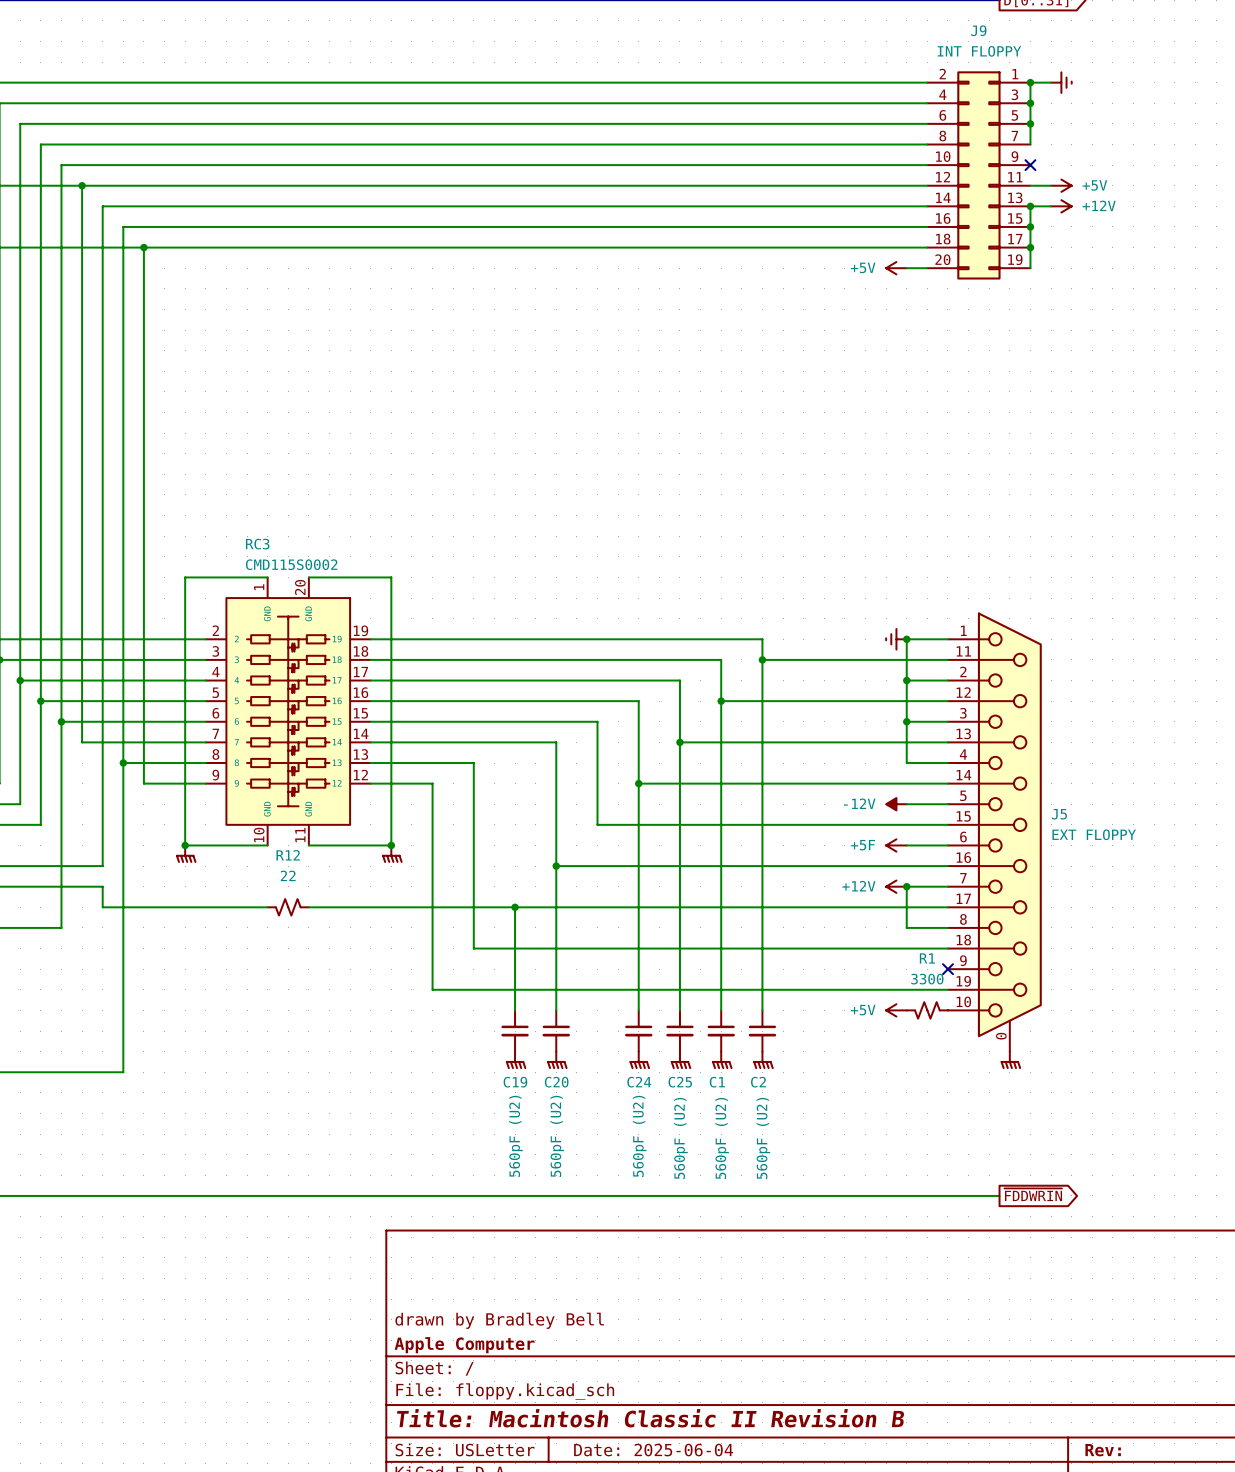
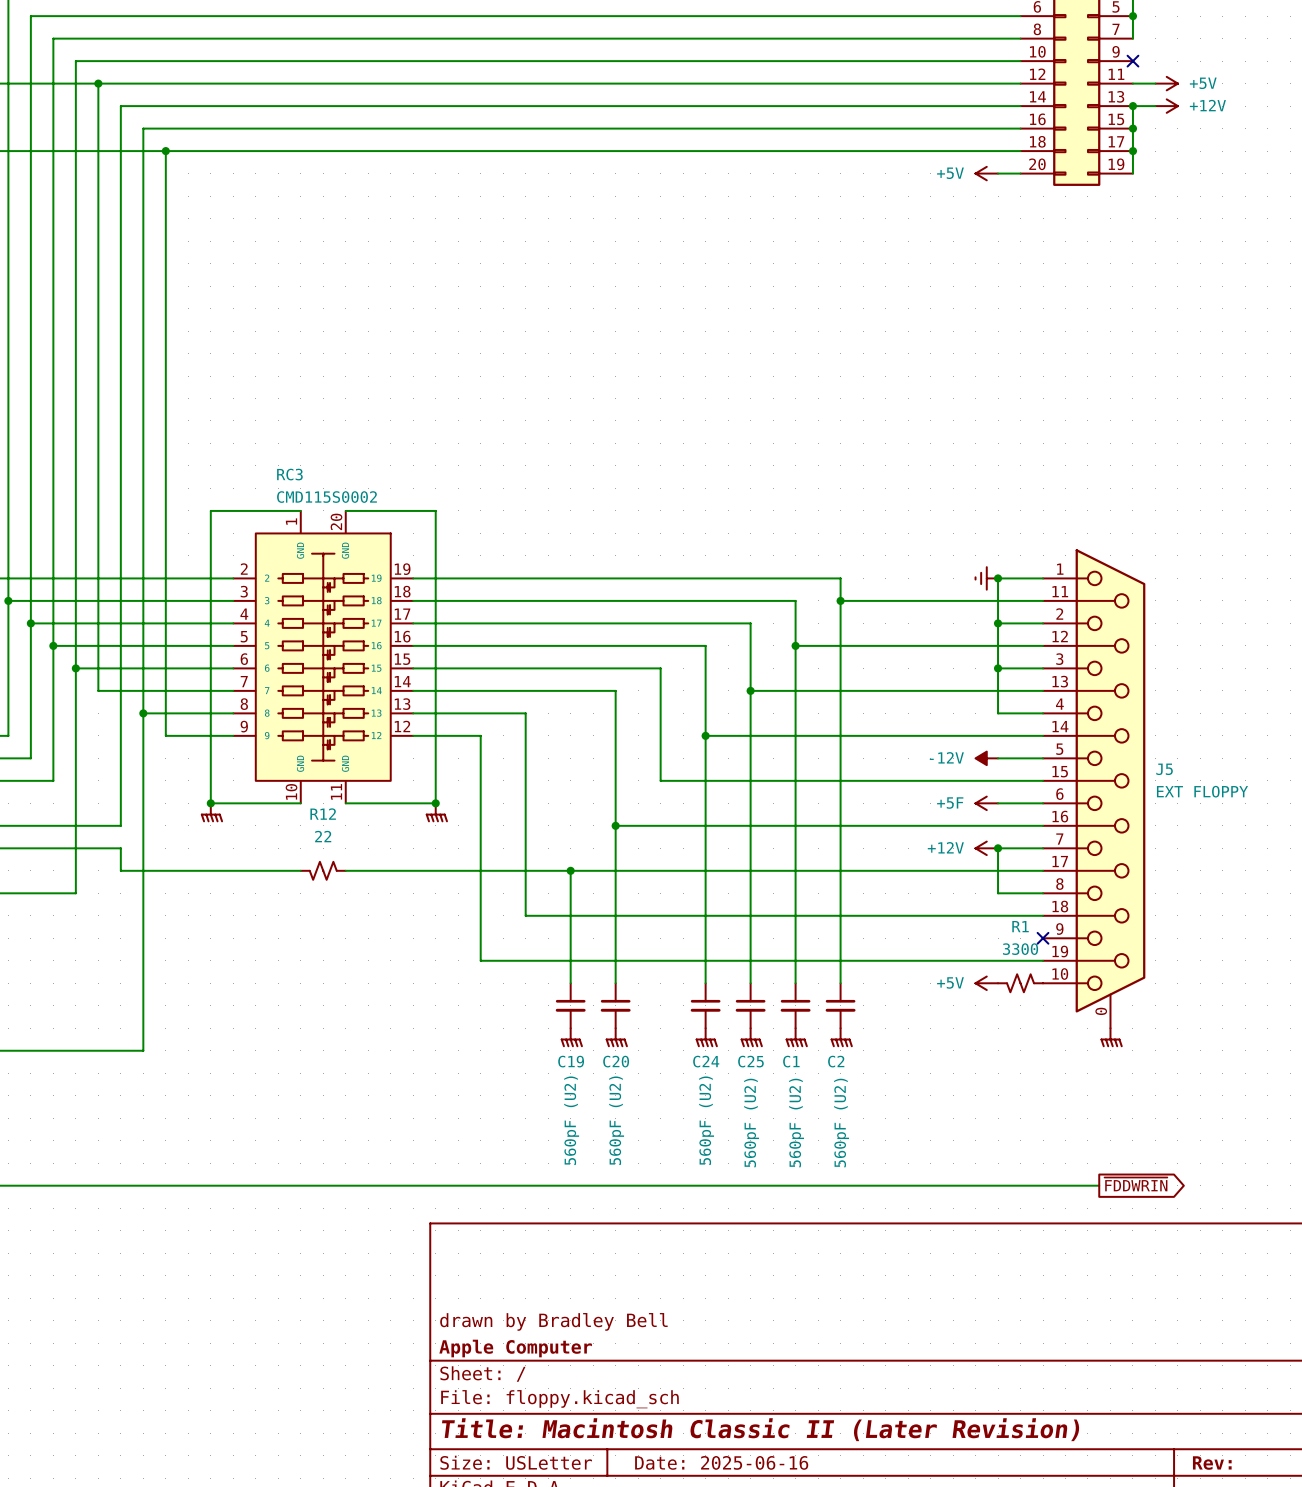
title block: Title: Macintosh Classic II Revision B (650, 1418) -> Title: Macintosh Classic II (Later Revision) (760, 1429)
title block: Date: 2025-06-04 (653, 1450) -> Date: 2025-06-16 (721, 1462)

